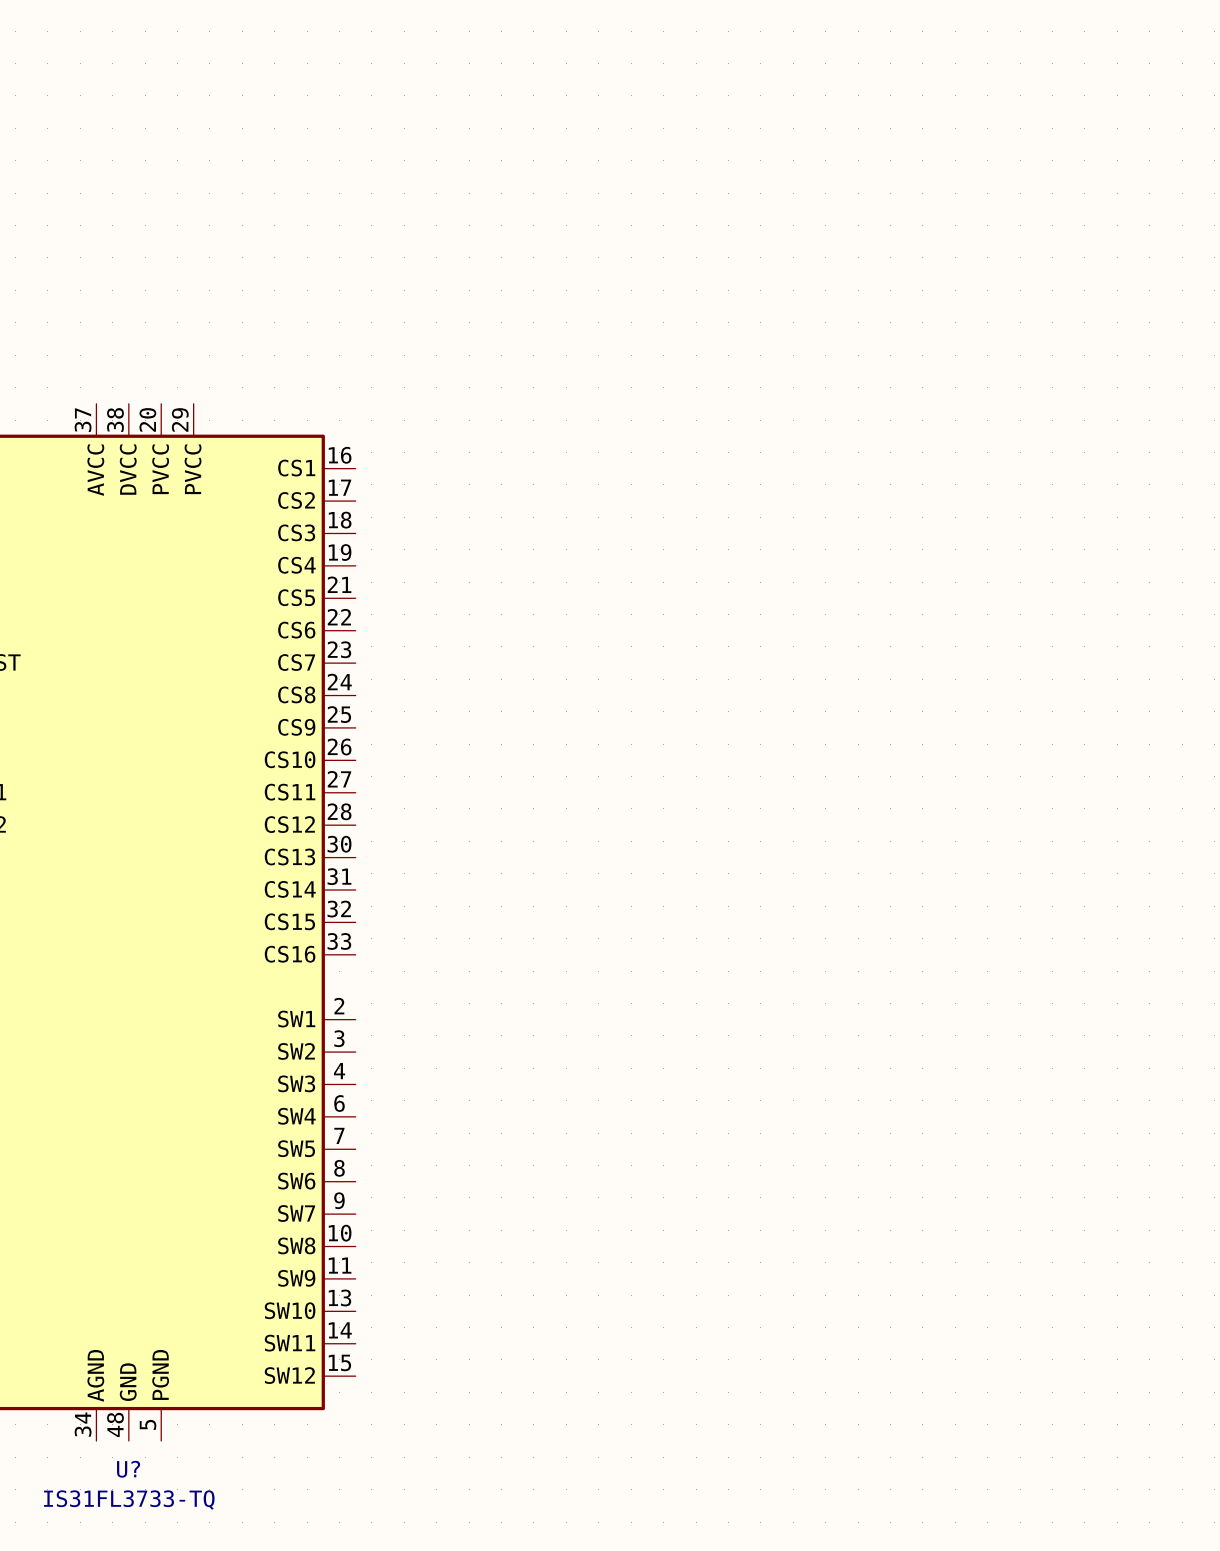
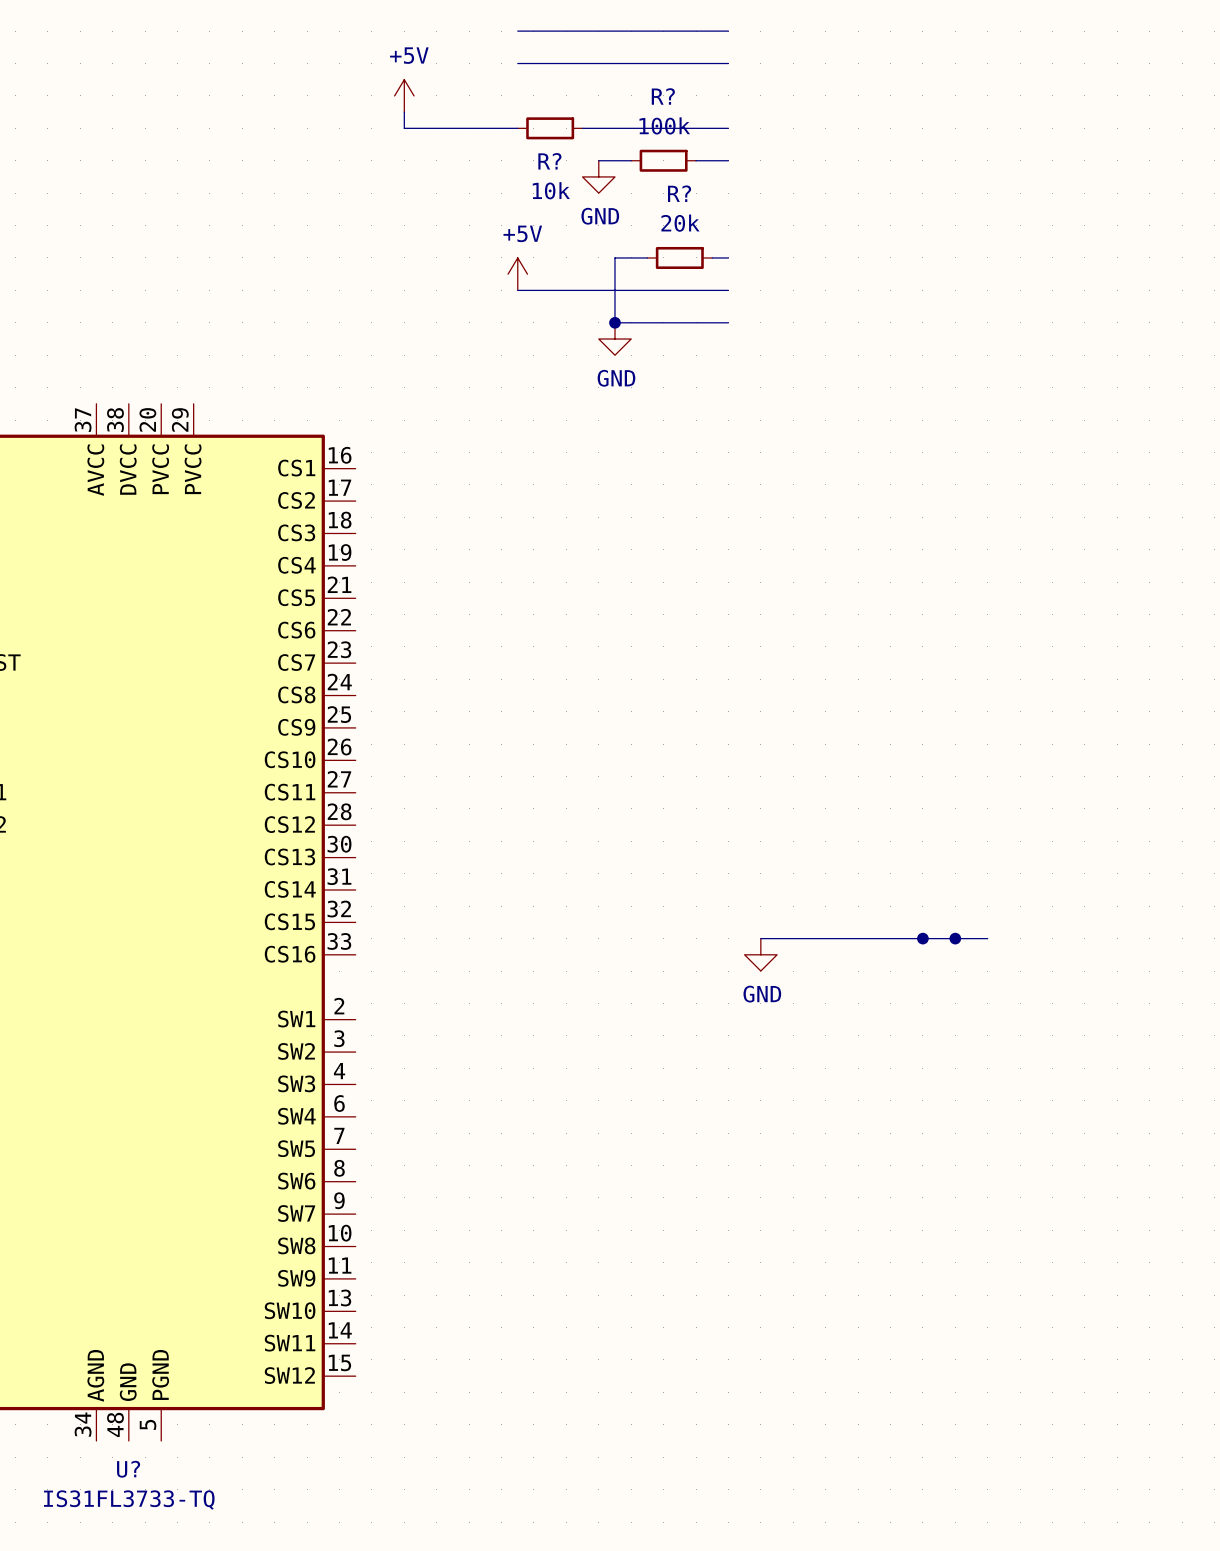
wire: none -> (517, 31) (728, 31)
wire: none -> (517, 63) (728, 63)
power symbol: none -> +5V (404, 95)
wire: none -> (404, 112) (404, 128) (517, 128)
R?: none -> 10k (550, 128)
wire: none -> (582, 128) (728, 128)
wire: none -> (598, 160) (631, 160)
R?: none -> 100k (663, 160)
wire: none -> (696, 160) (728, 160)
power symbol: none -> GND (598, 176)
wire: none -> (647, 257) (614, 257) (614, 322) (728, 322)
R?: none -> 20k (679, 257)
wire: none -> (712, 257) (728, 257)
power symbol: none -> +5V (517, 274)
wire: none -> (517, 290) (728, 290)
junction: none -> (614, 322)
power symbol: none -> GND (614, 339)
wire: none -> (760, 938) (987, 938)
junction: none -> (922, 938)
junction: none -> (955, 938)
power symbol: none -> GND (760, 954)

